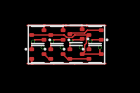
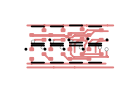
line: (28, 25) (104, 25) (104, 63) (28, 63) (28, 25) -> none
track: none -> (105, 25) (113, 25)
track: none -> (107, 31) (94, 31) (89, 35) (74, 35)
track: none -> (32, 35) (67, 35) (70, 39) (70, 54) (73, 56) (107, 56) (106, 49)
track: none -> (86, 40) (77, 40) (74, 44) (74, 52)
track: none -> (107, 40) (98, 40) (95, 44) (95, 52)
via position: (90, 41) -> (106, 49)
track: none -> (27, 67) (113, 67)

